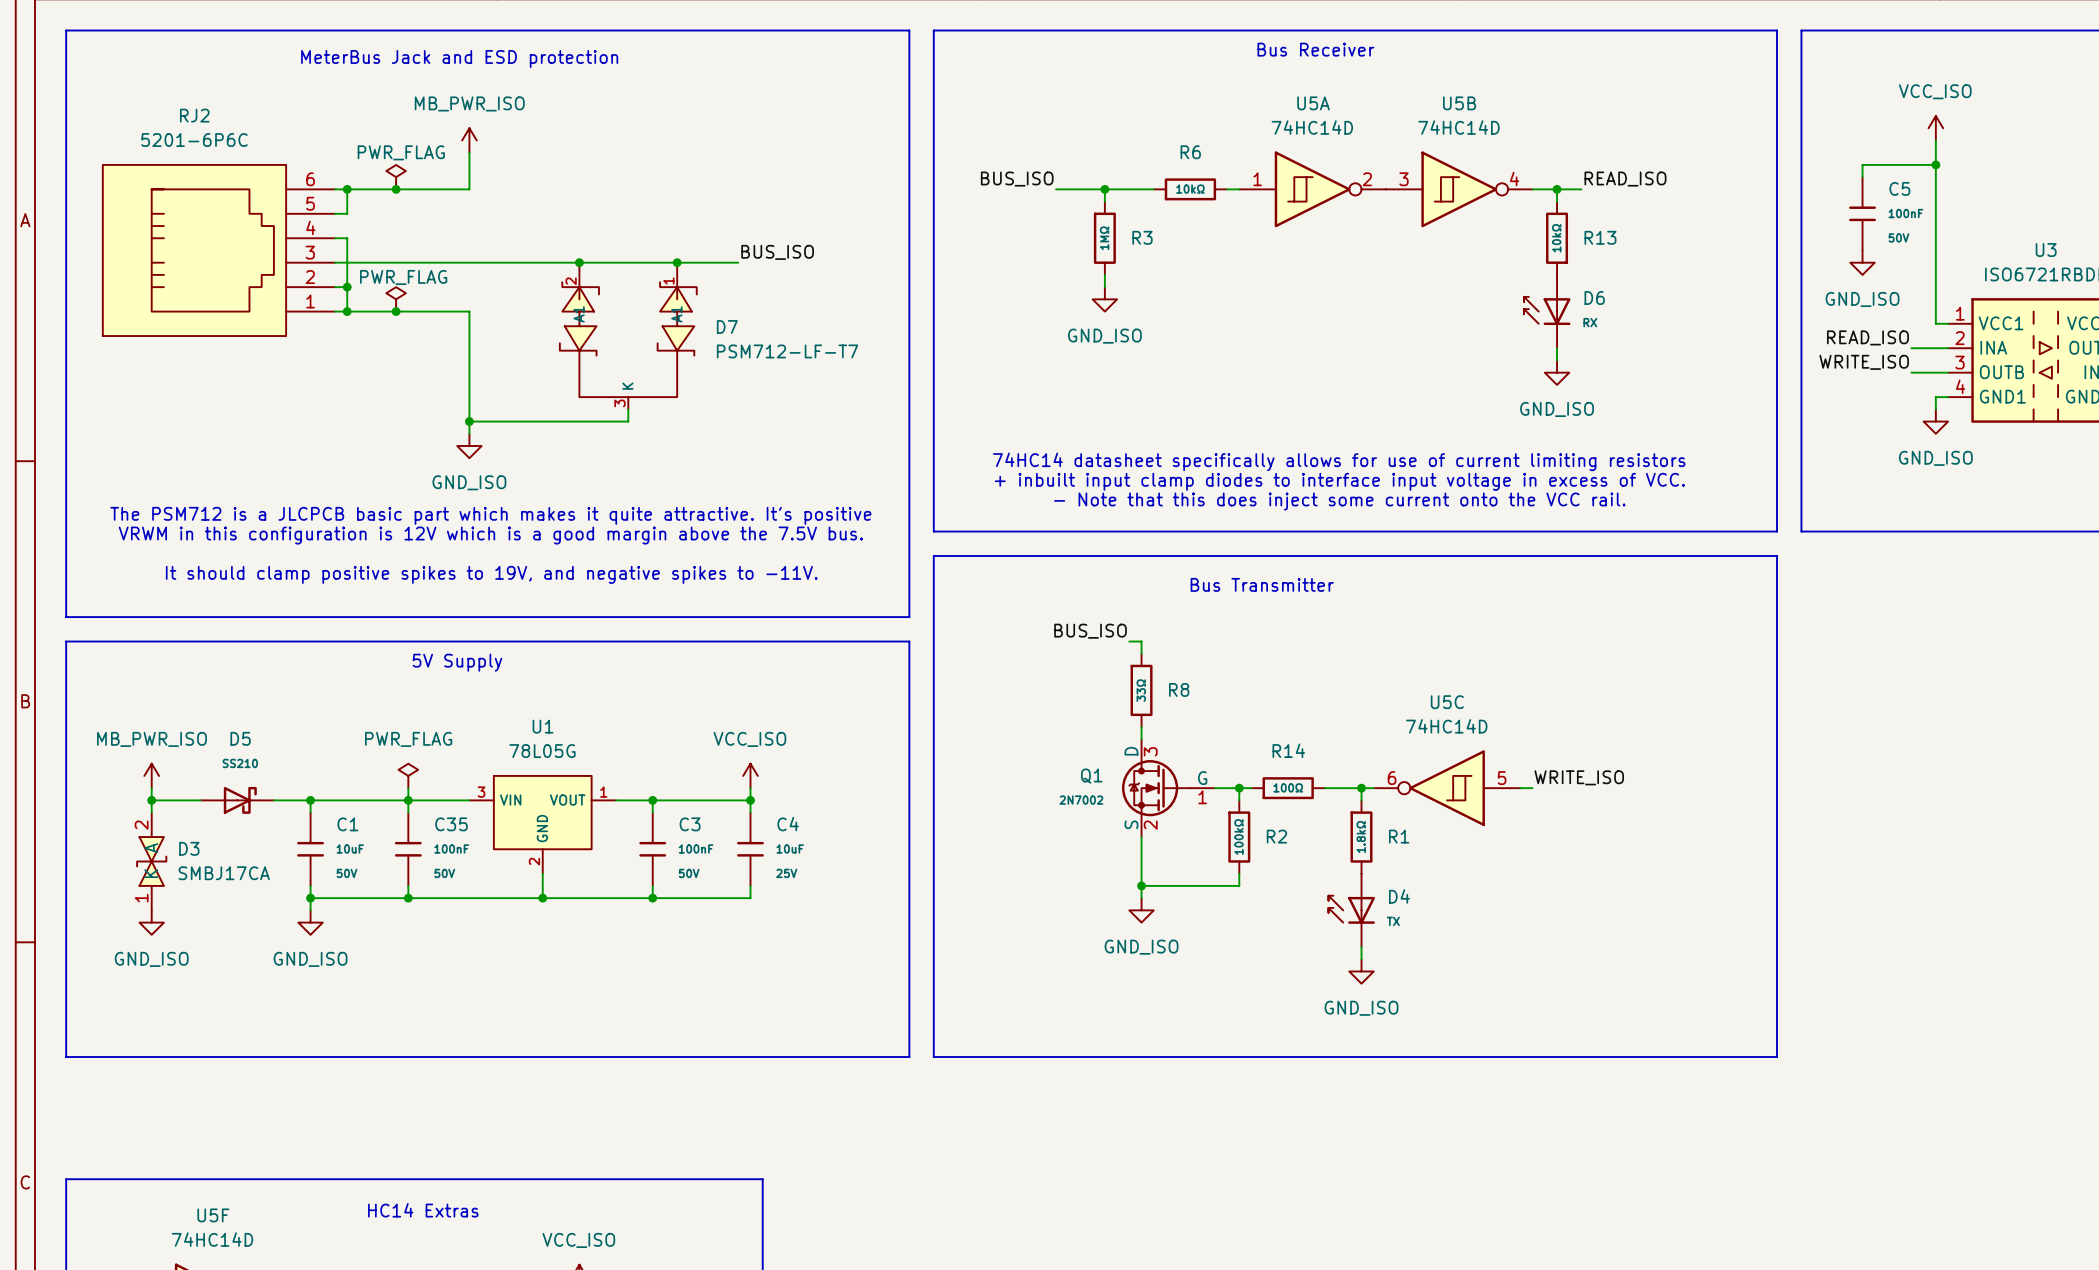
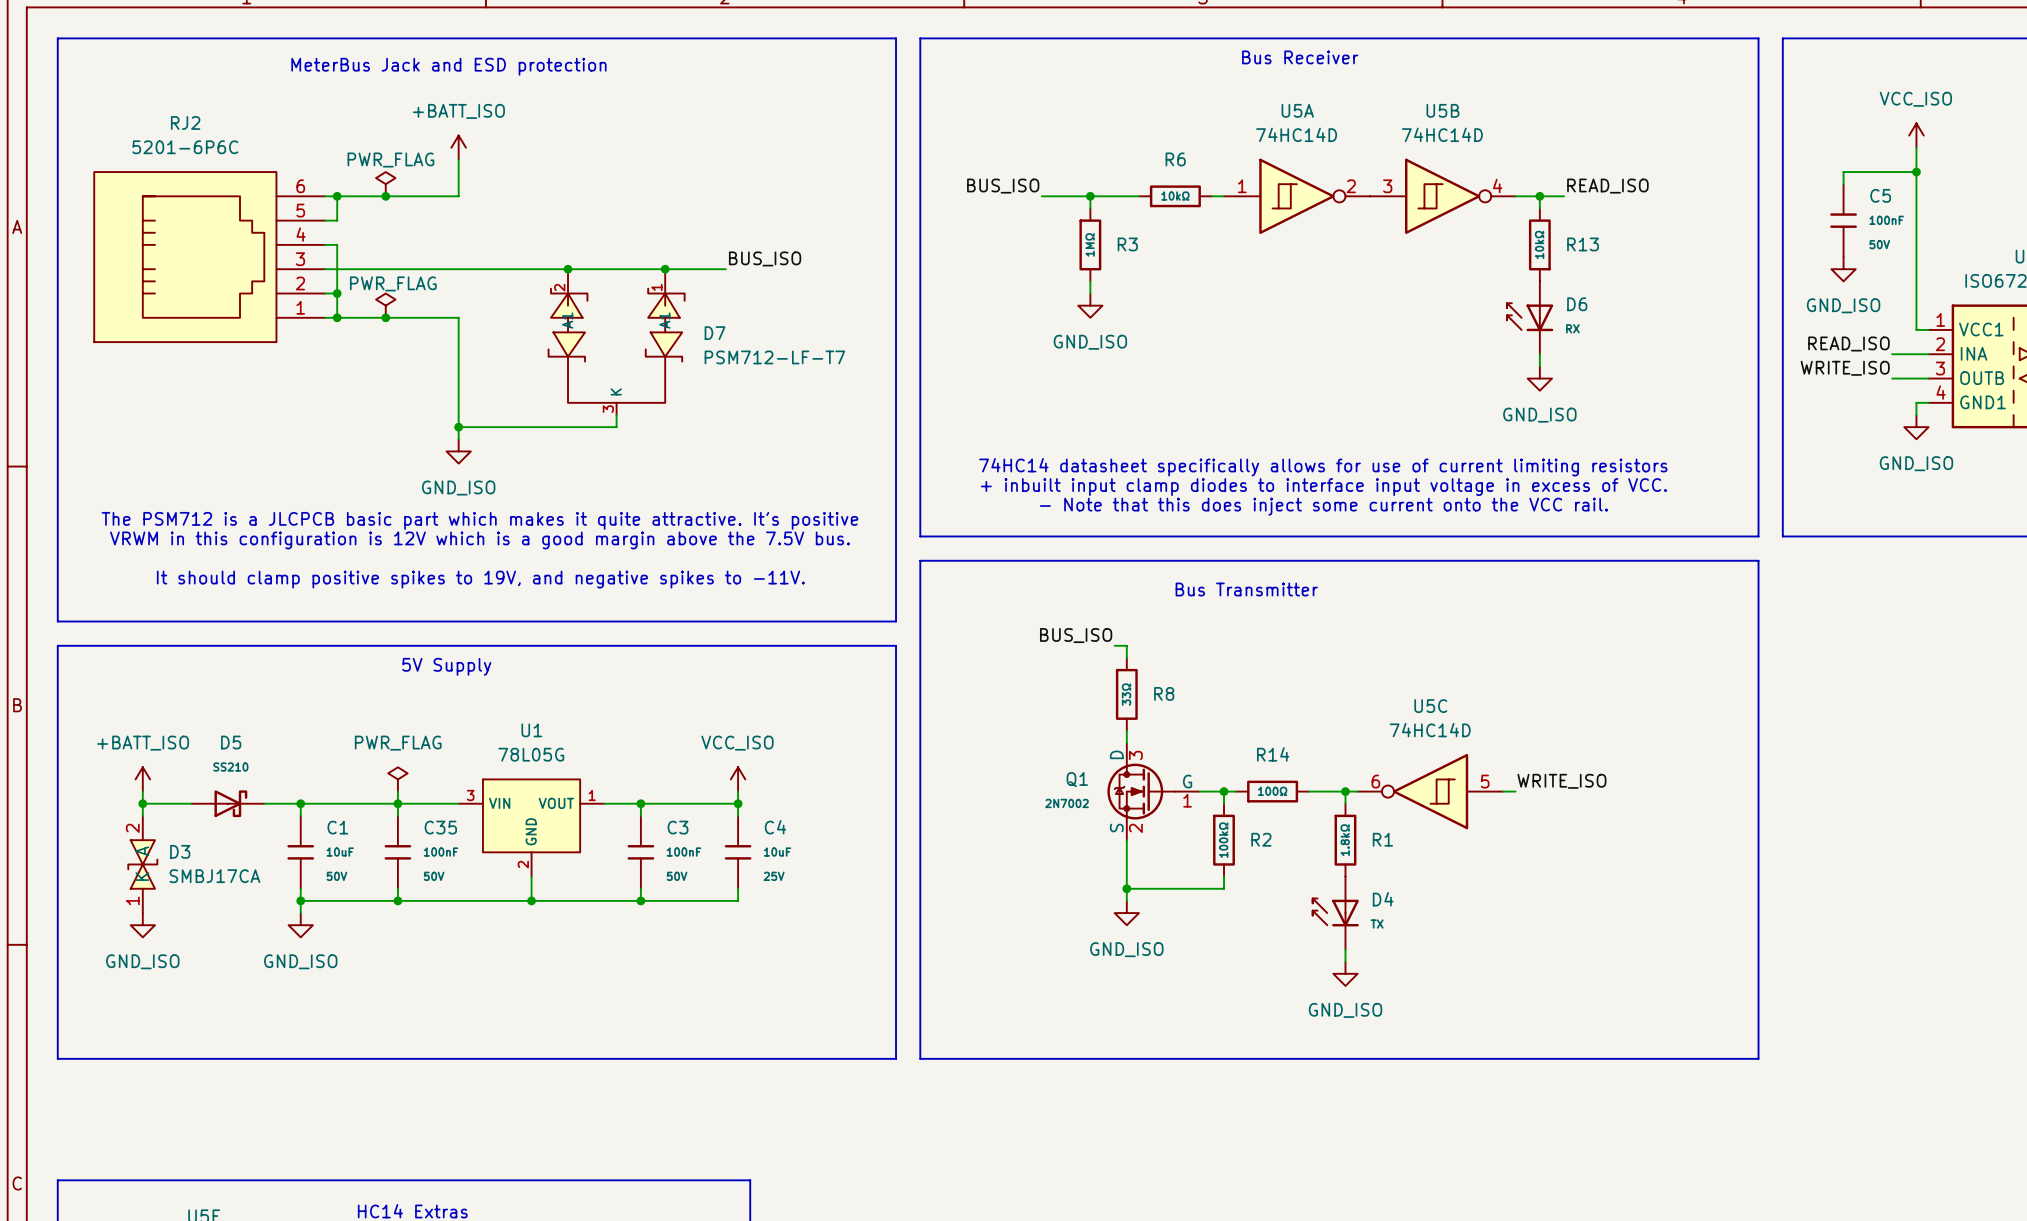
power symbol: MB_PWR_ISO (469, 140) -> +BATT_ISO (458, 147)
power symbol: MB_PWR_ISO (151, 775) -> +BATT_ISO (142, 779)

